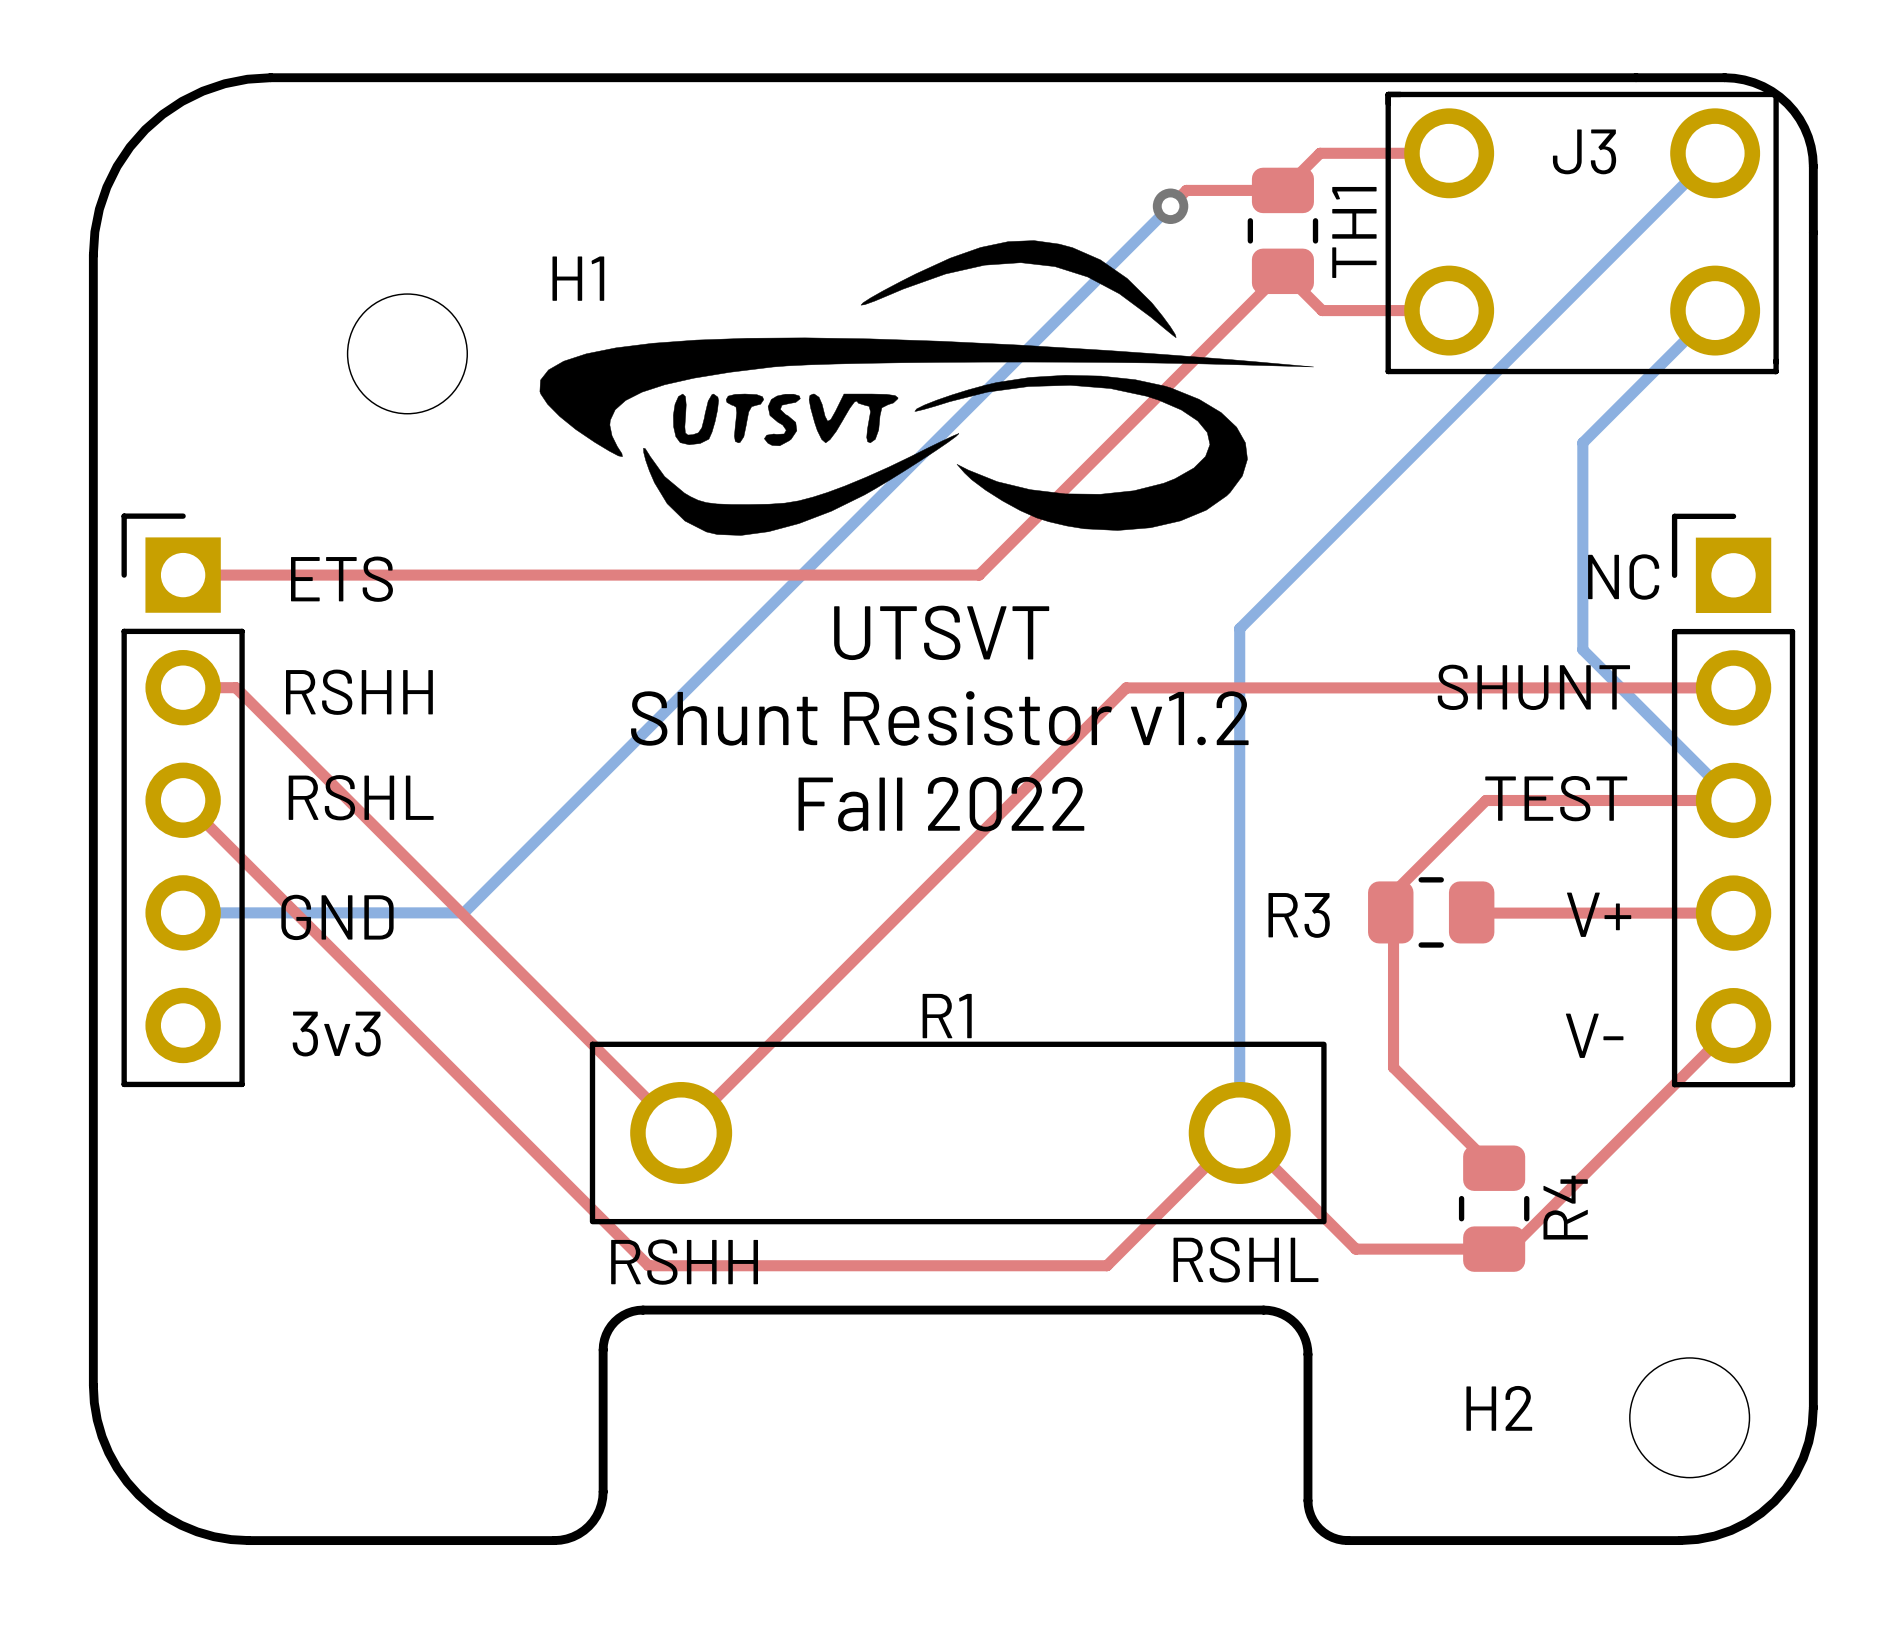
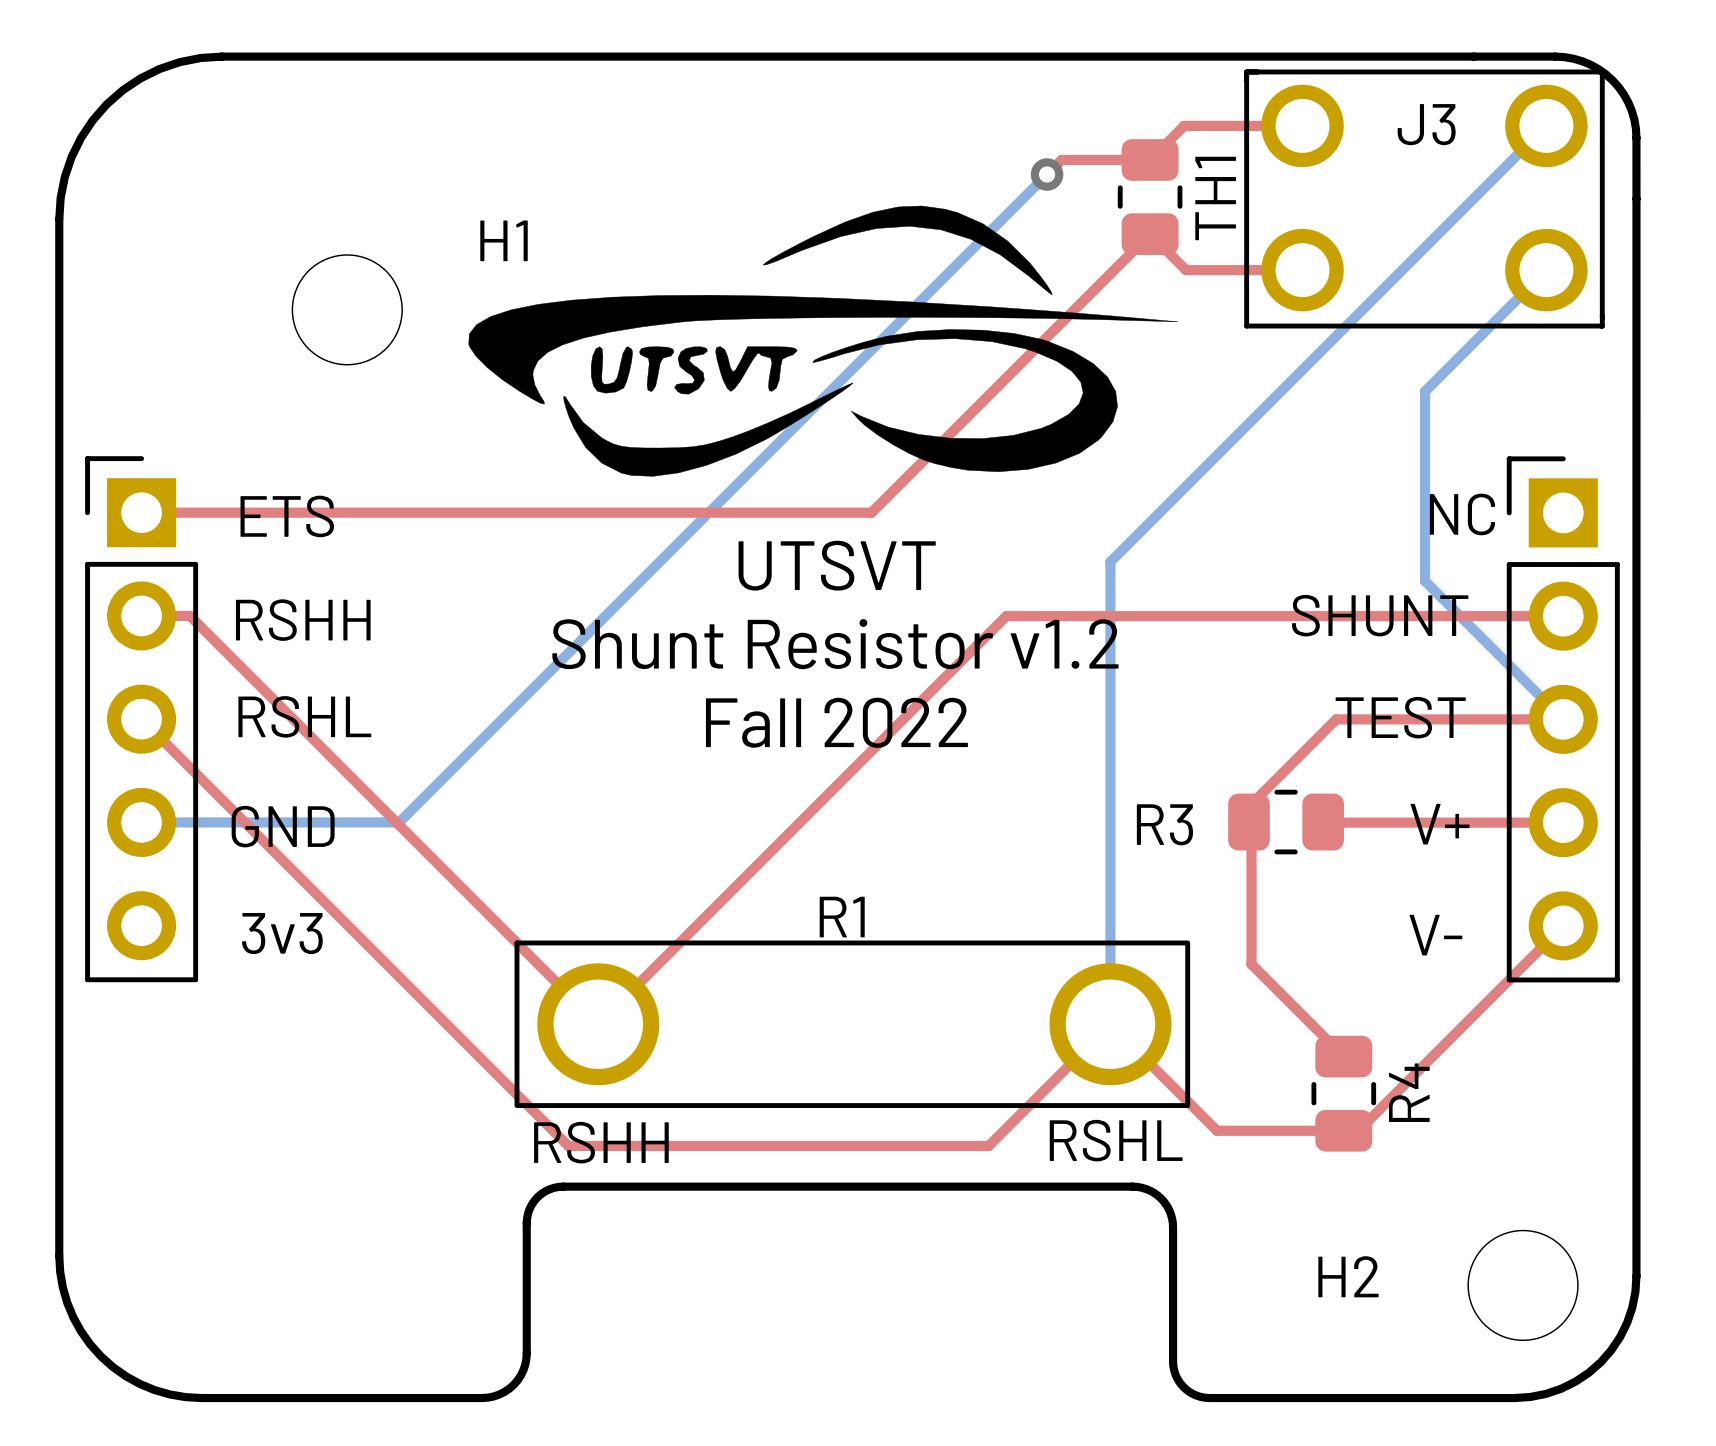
R1 footprint: [589, 1041, 1327, 1225] -> [514, 940, 1191, 1108]

